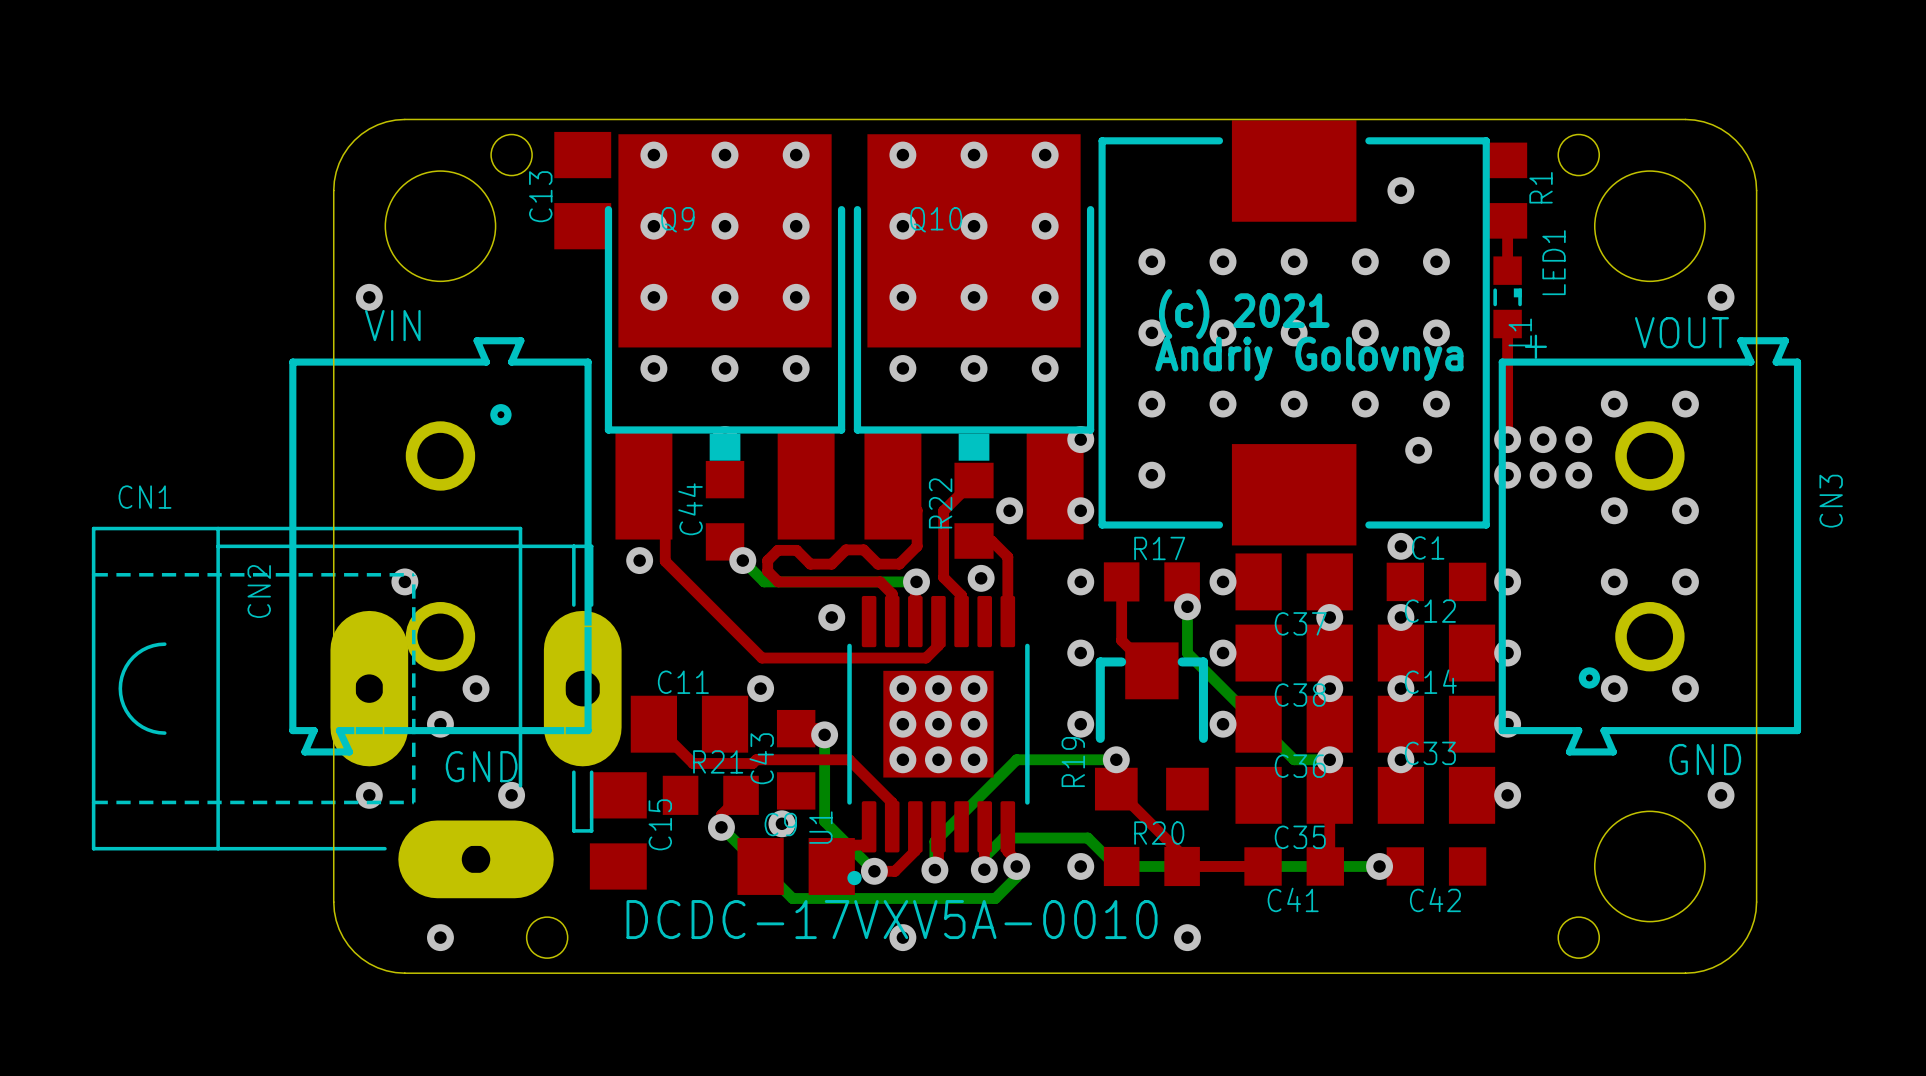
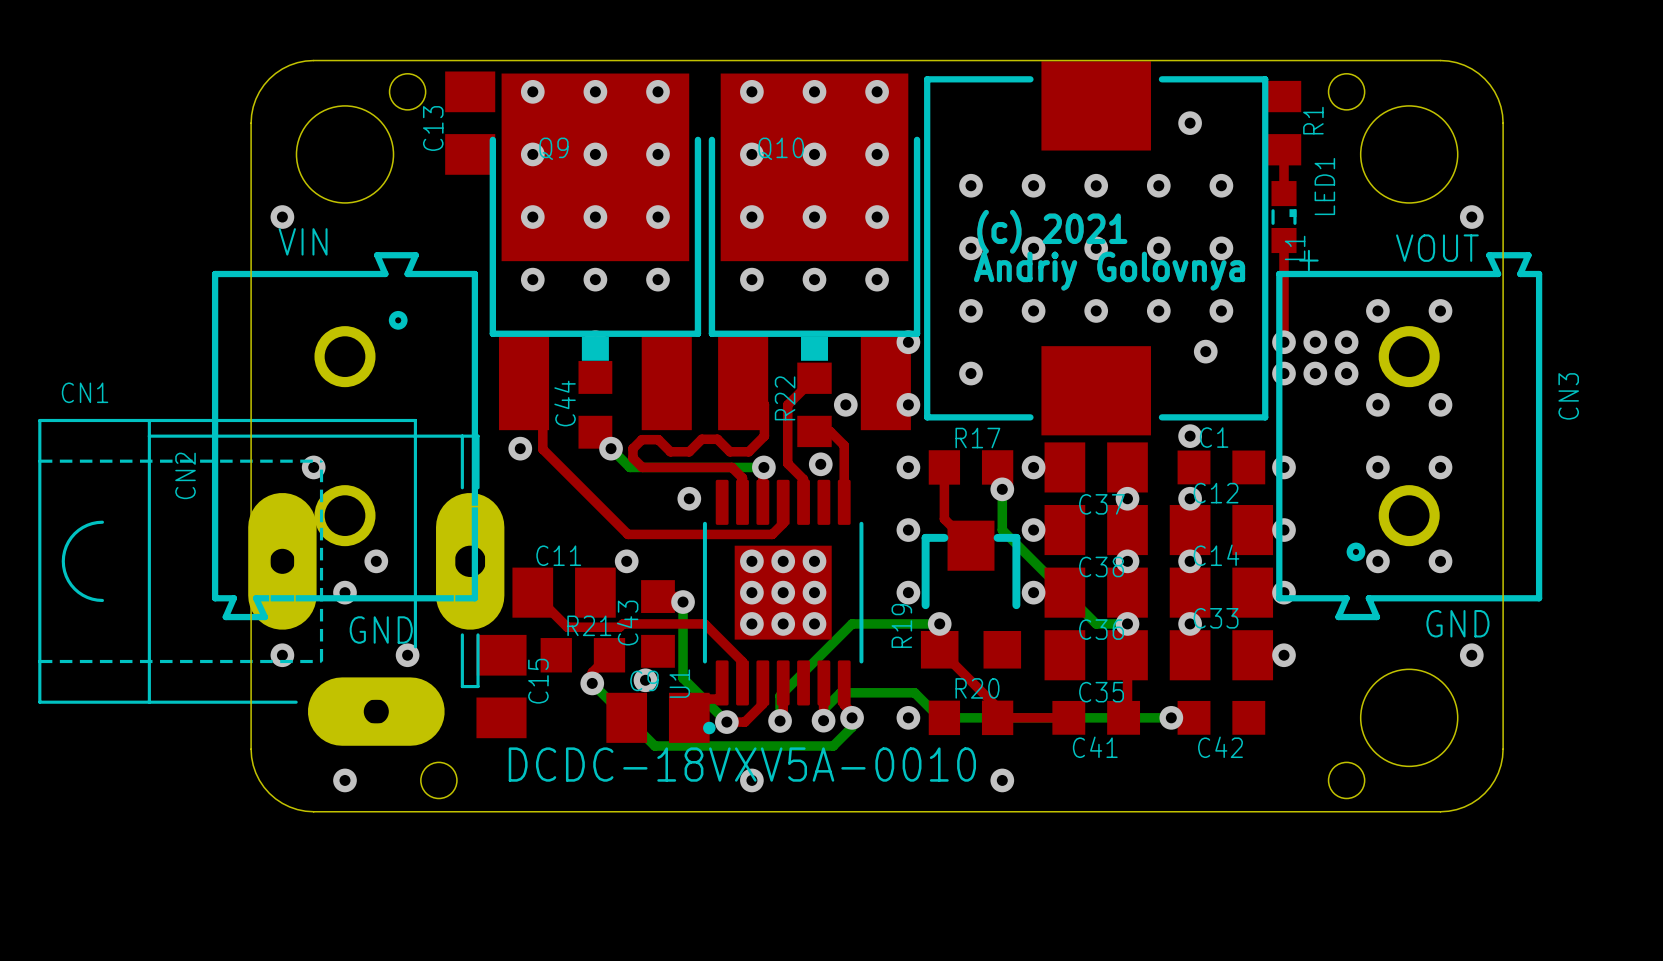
text: DCDC-17VXV5A-0010 (892, 919) -> DCDC-18VXV5A-0010 (742, 764)

